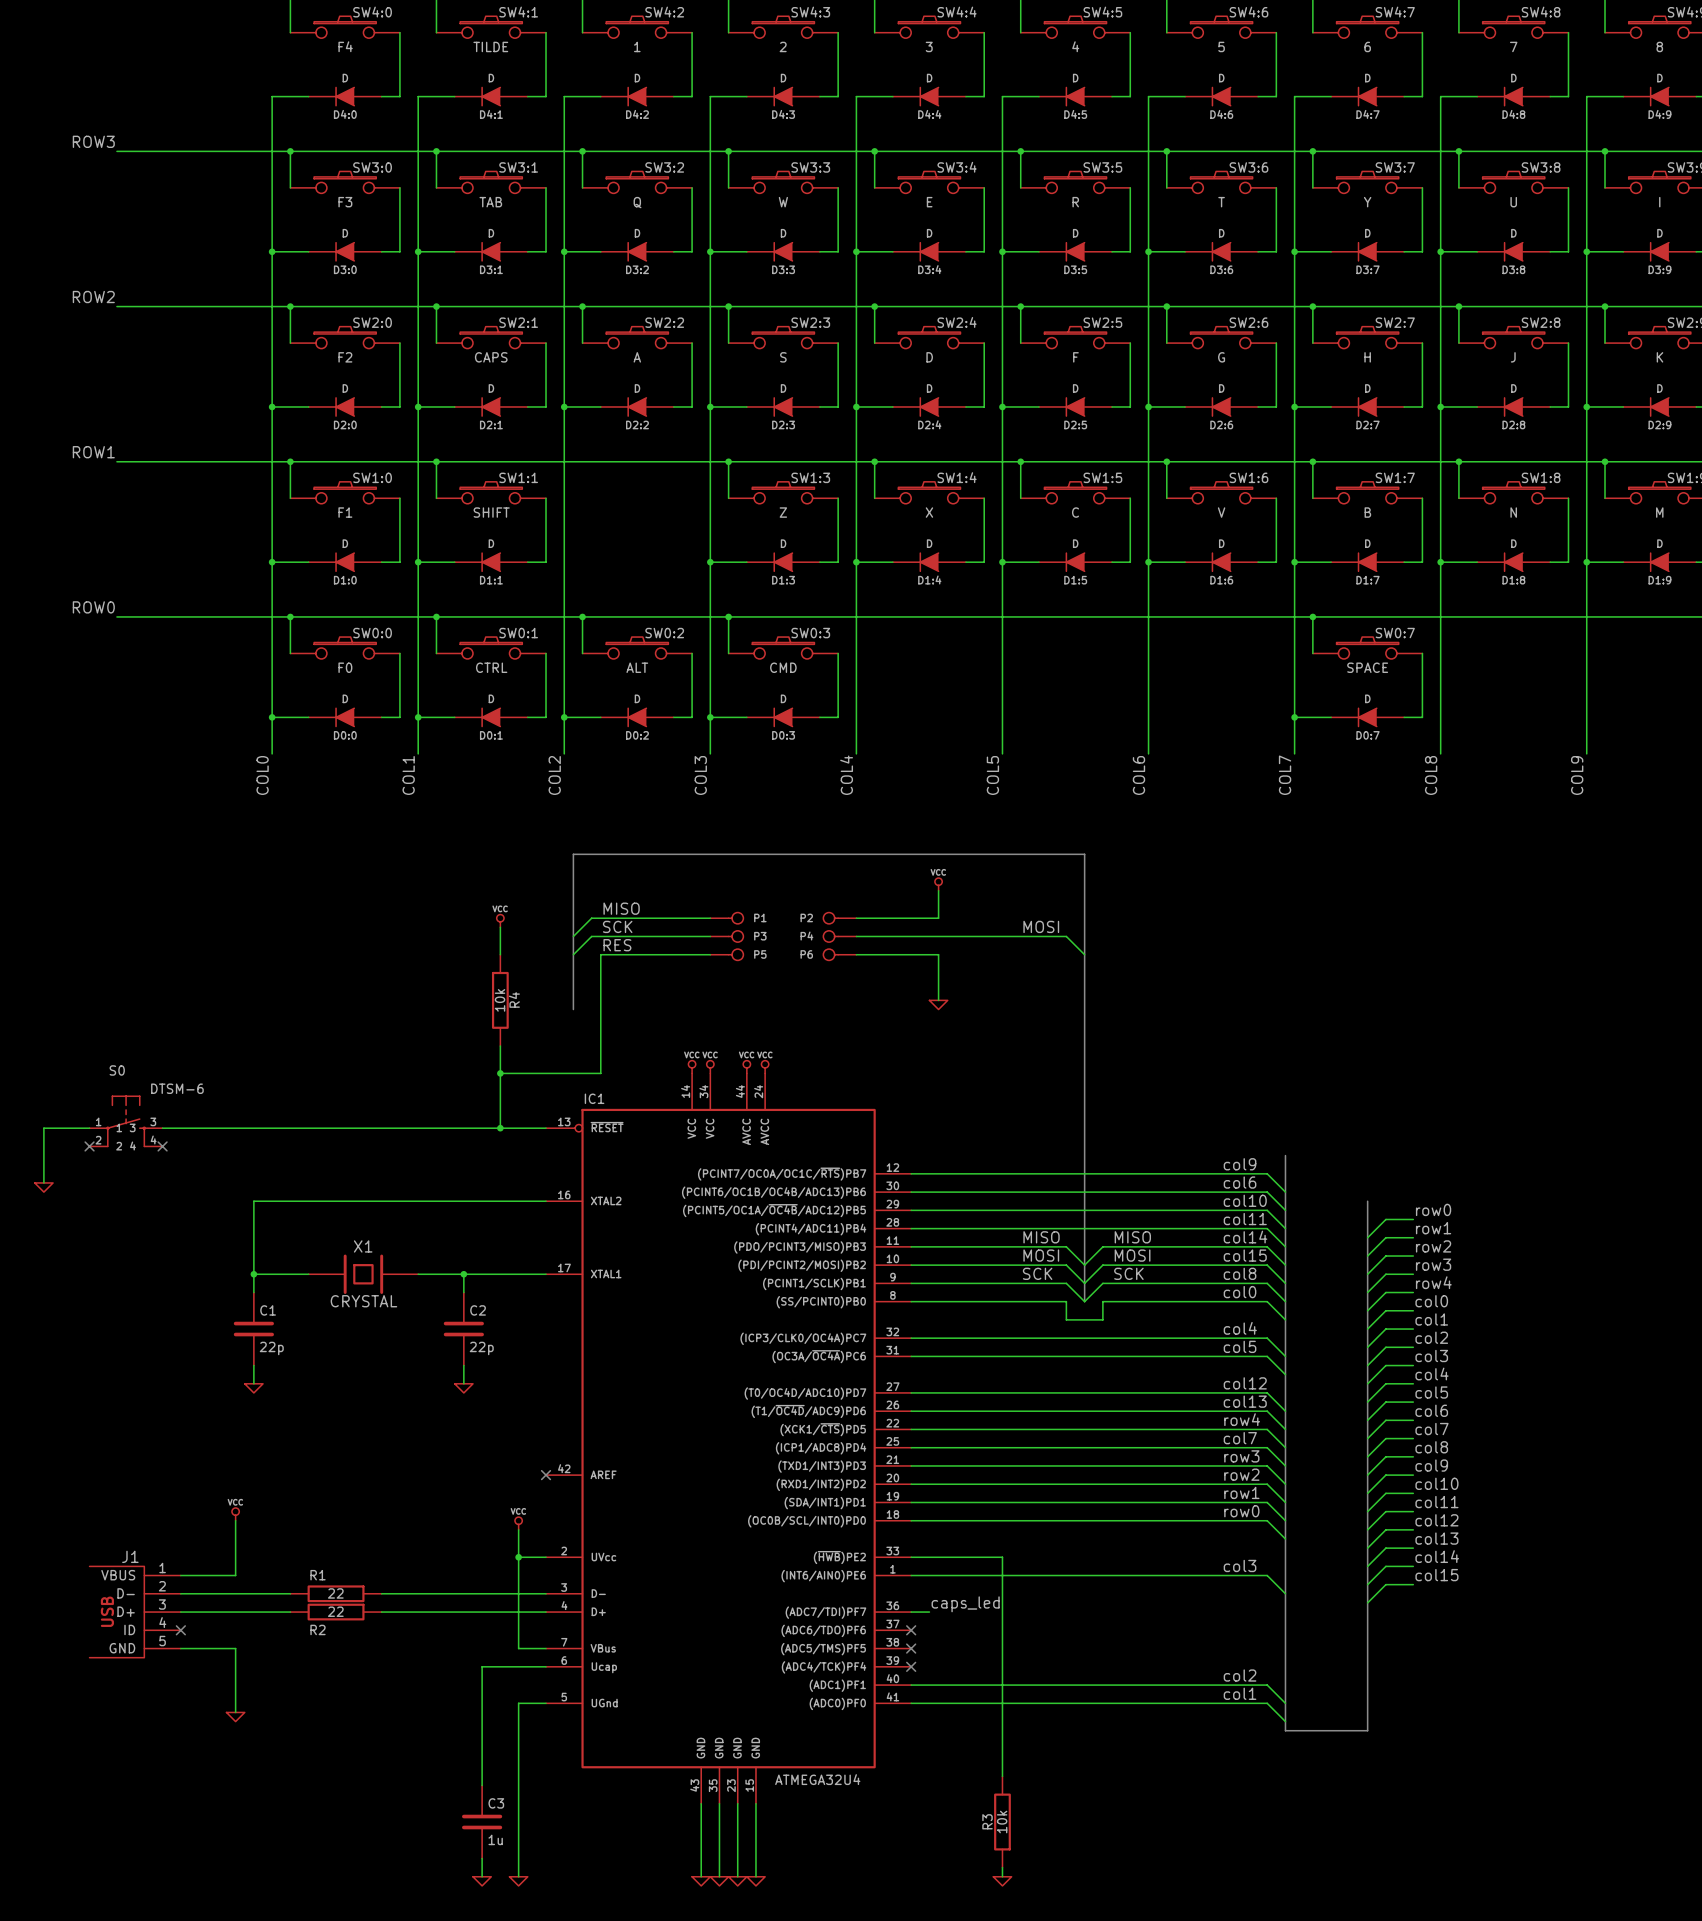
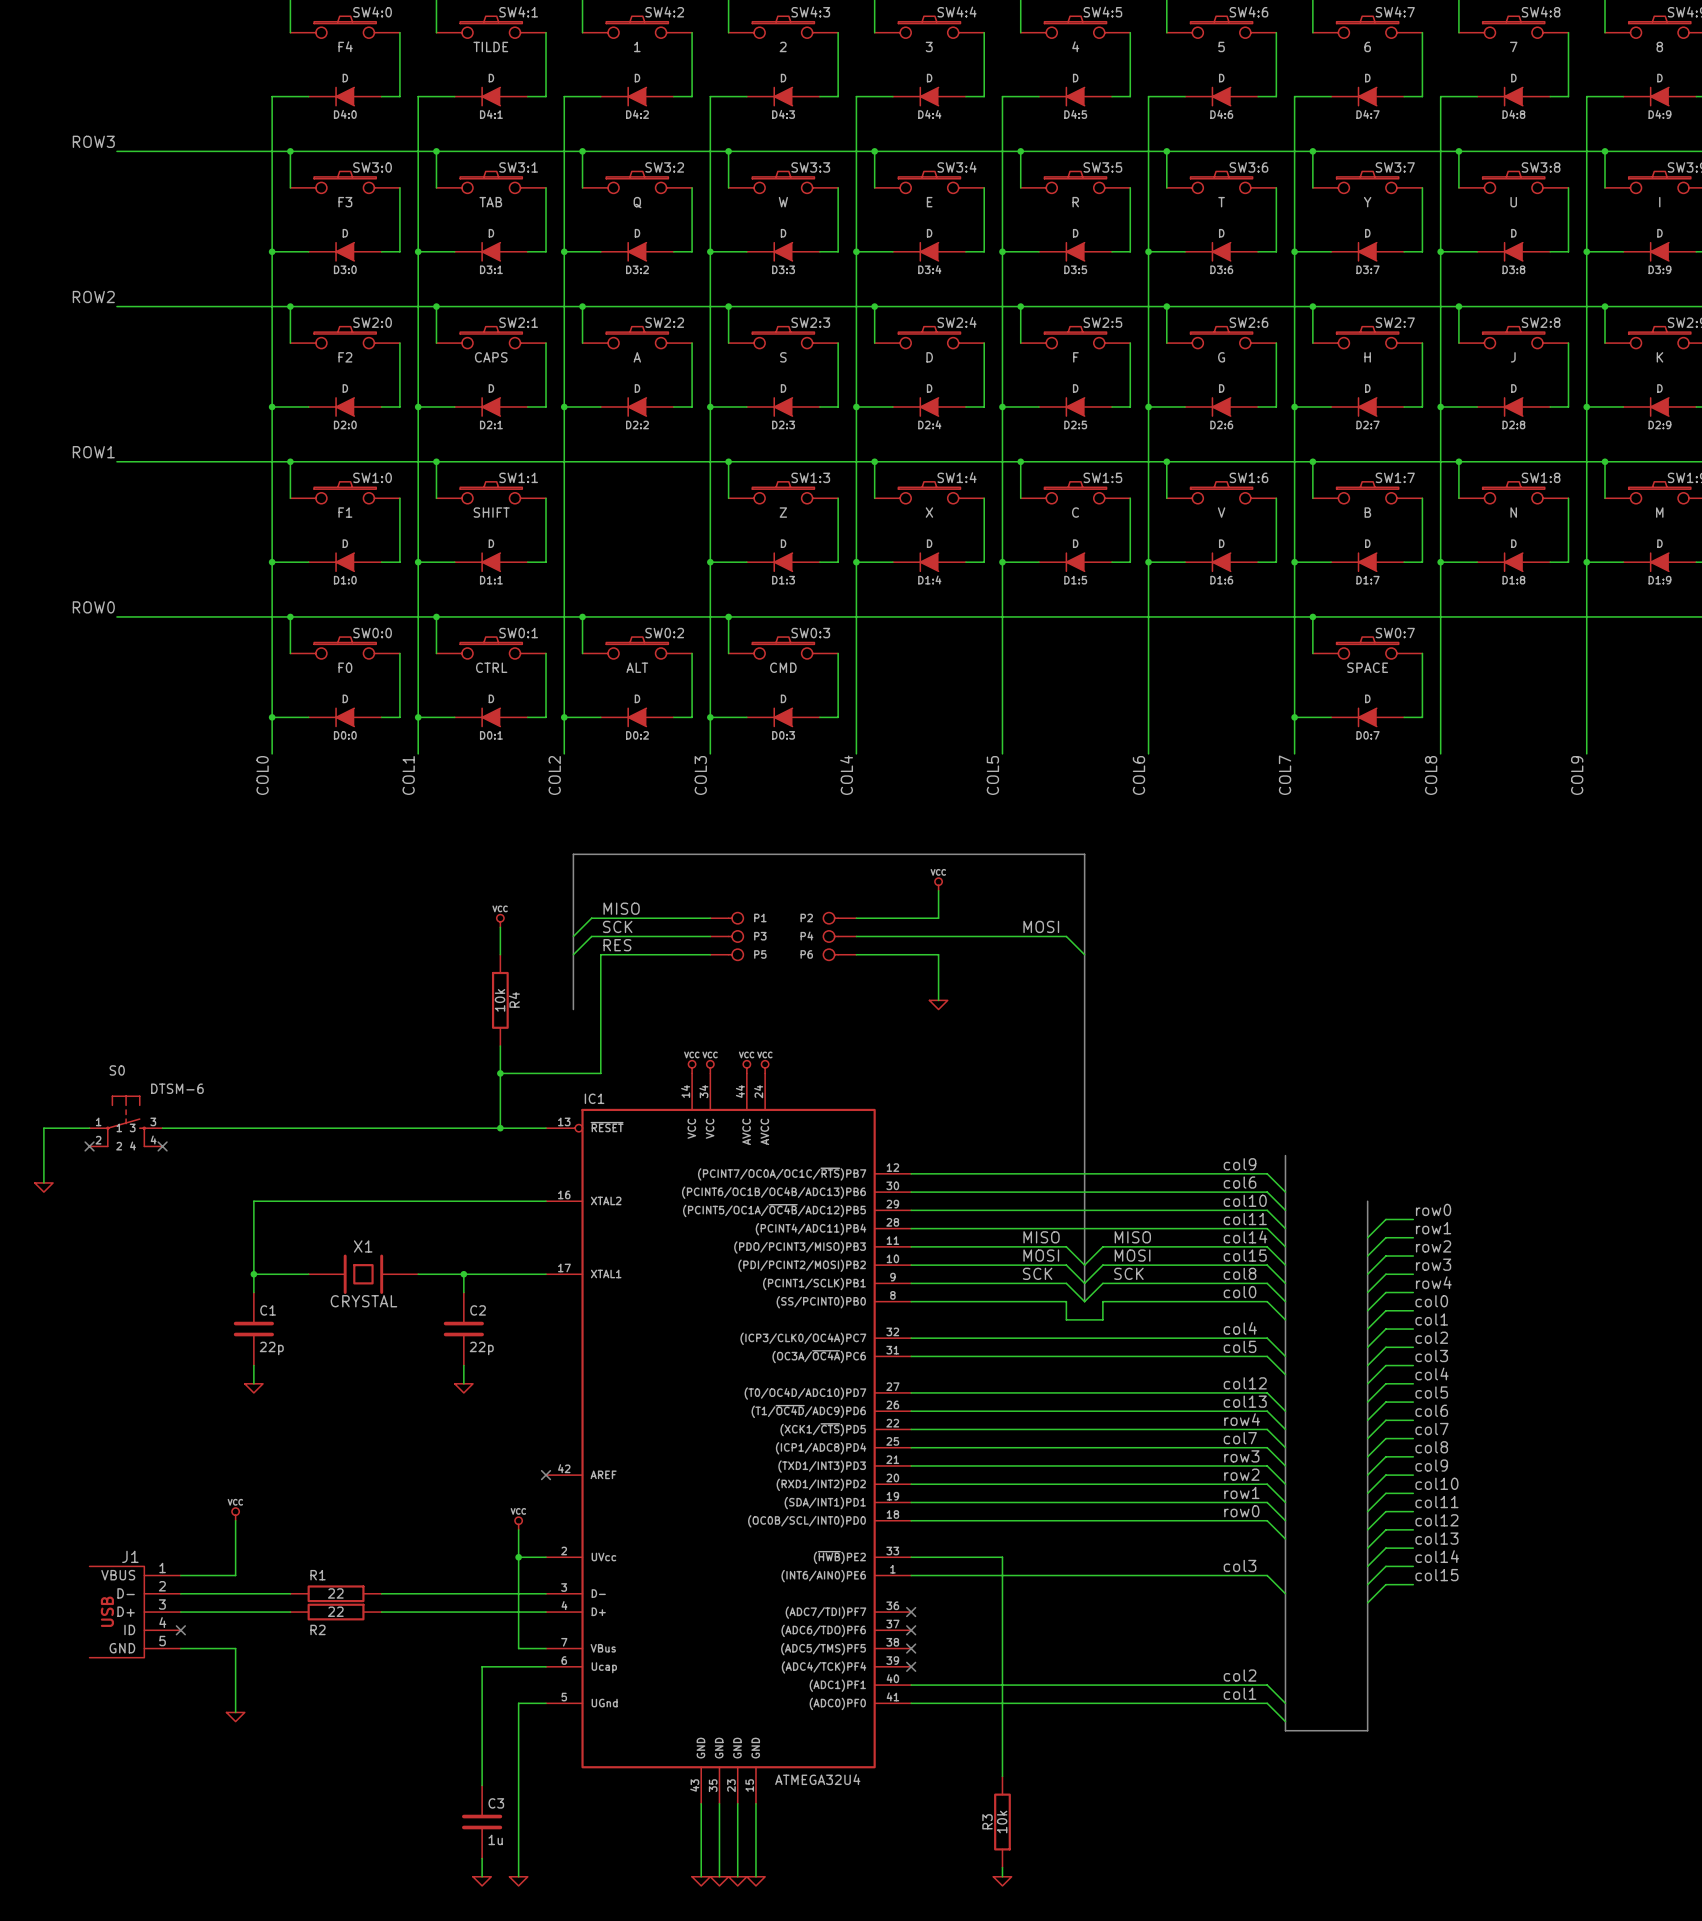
label: caps_led (965, 1604) -> none
wire: (911, 1612) (929, 1612) -> none
no-connect mark: none -> (911, 1612)

